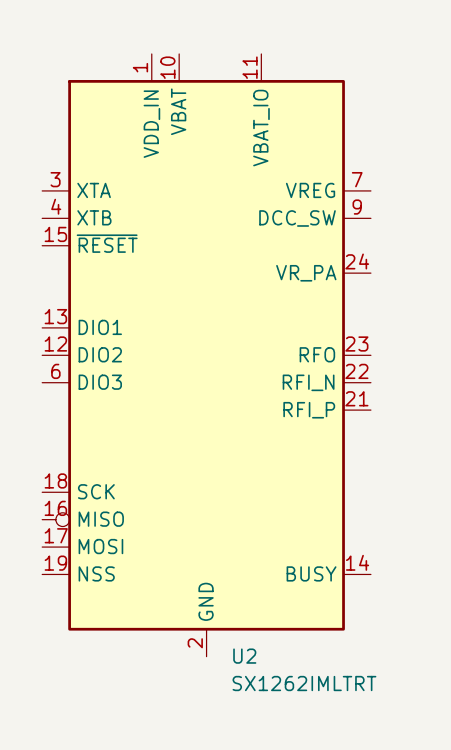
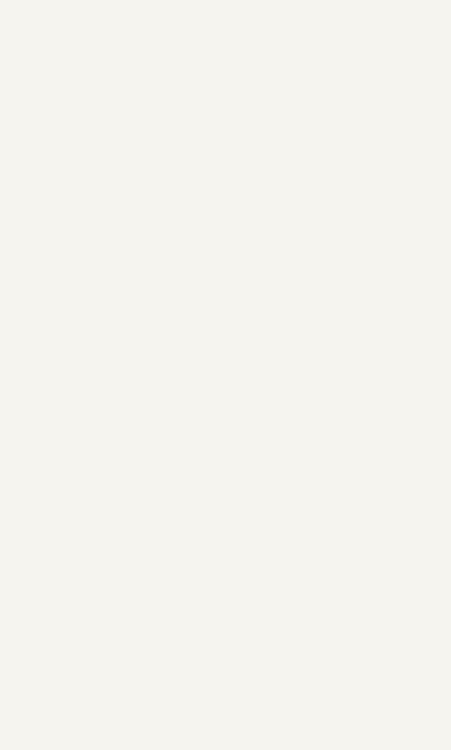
U2: SX1262IMLTRT (206, 355) -> none

